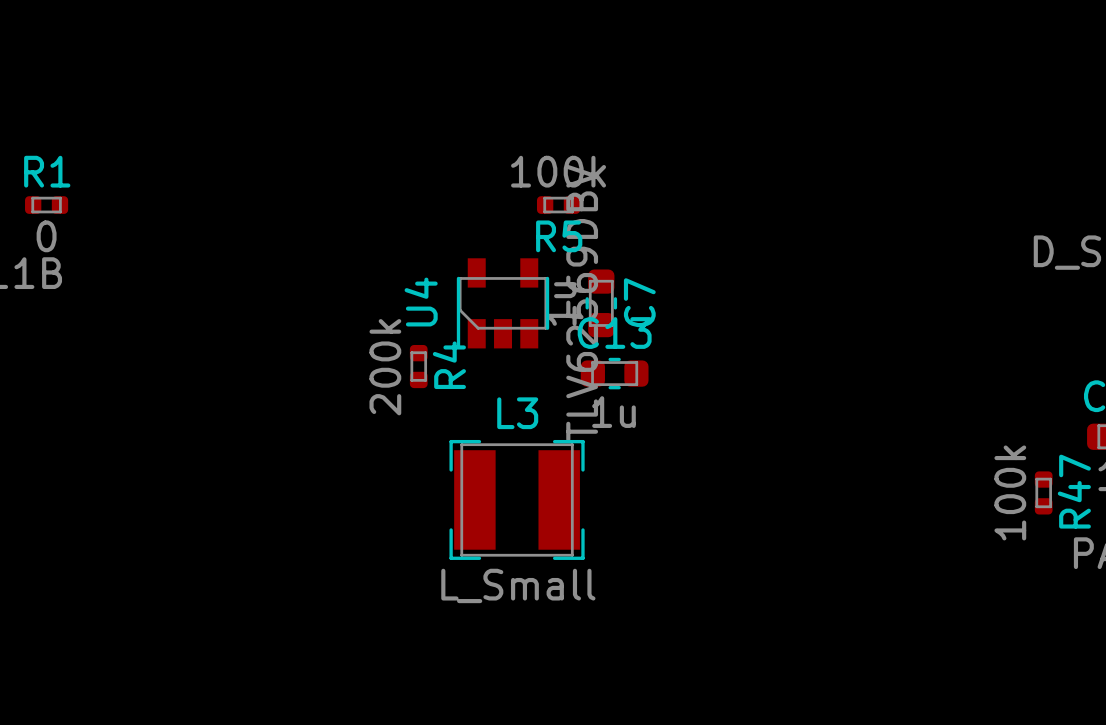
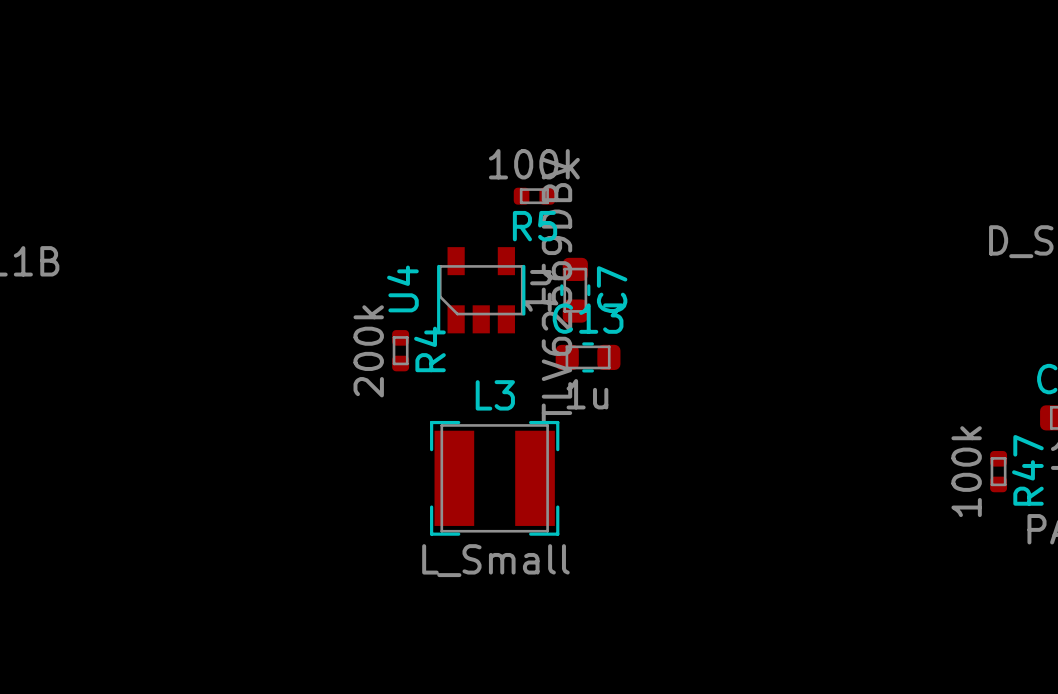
R1: 0 (46, 205) -> none

